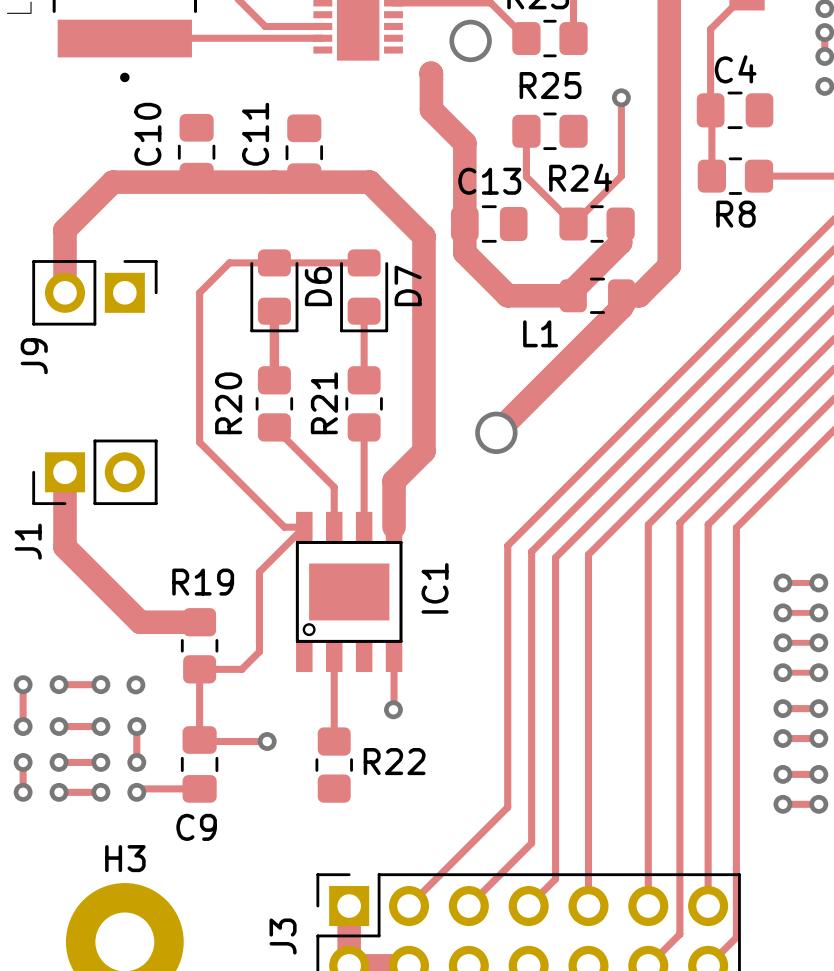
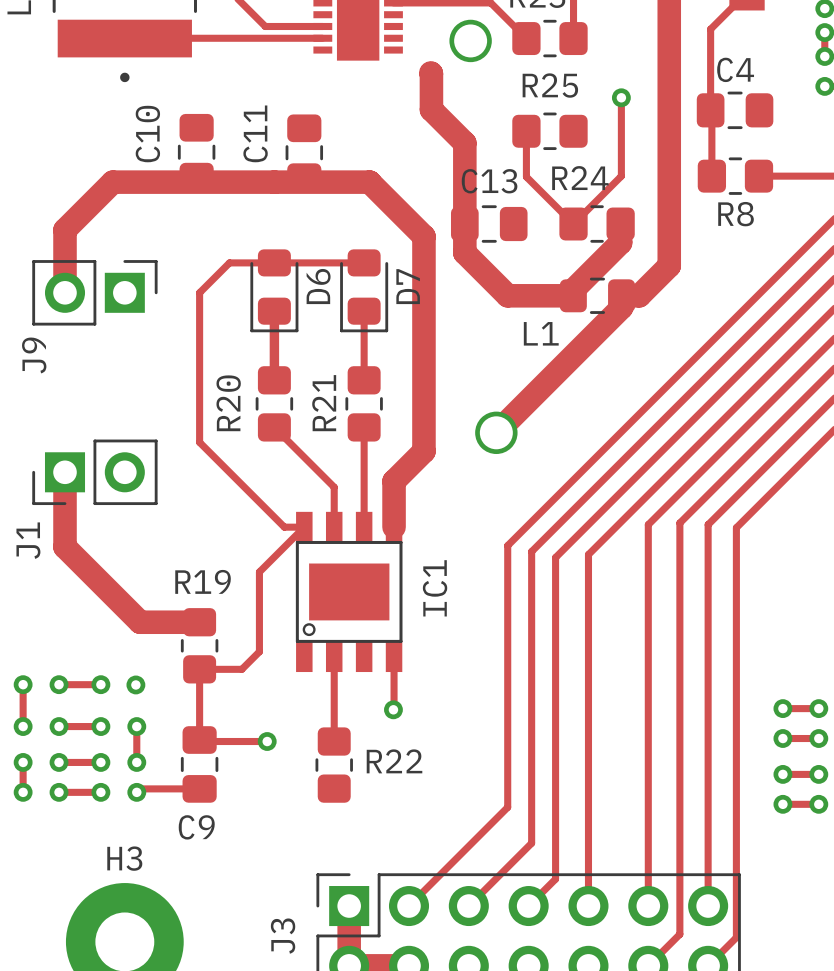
track: (782, 582) (818, 582) -> none
via: (782, 582) -> none
via: (818, 582) -> none
track: (782, 612) (818, 612) -> none
via: (782, 612) -> none
via: (818, 612) -> none
track: (782, 642) (818, 642) -> none
via: (782, 642) -> none
via: (818, 642) -> none
track: (782, 672) (818, 672) -> none
via: (782, 672) -> none
via: (818, 672) -> none

